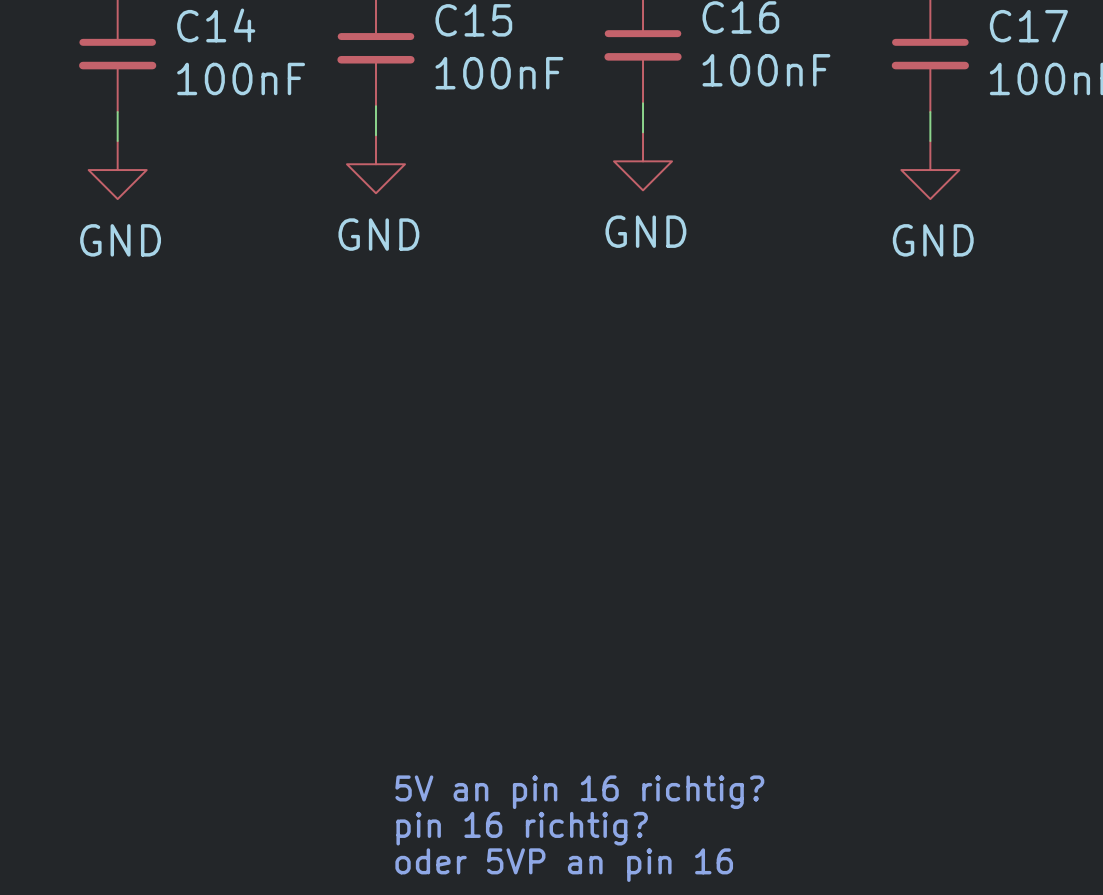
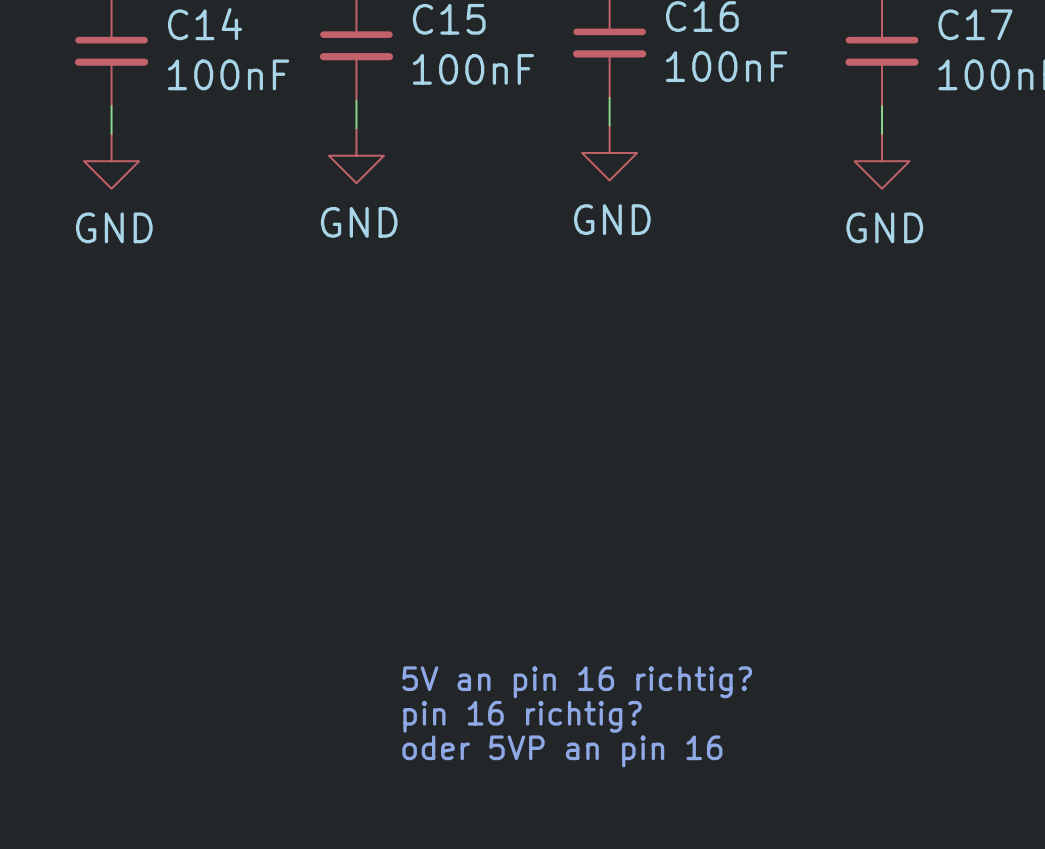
text position: 5V an pin 16 richtig? (579, 792) -> 5V an pin 16 richtig? (577, 682)
text position: pin 16 richtig? (522, 828) -> pin 16 richtig? (522, 716)
text position: oder 5VP an pin 16 (564, 865) -> oder 5VP an pin 16 (562, 751)

